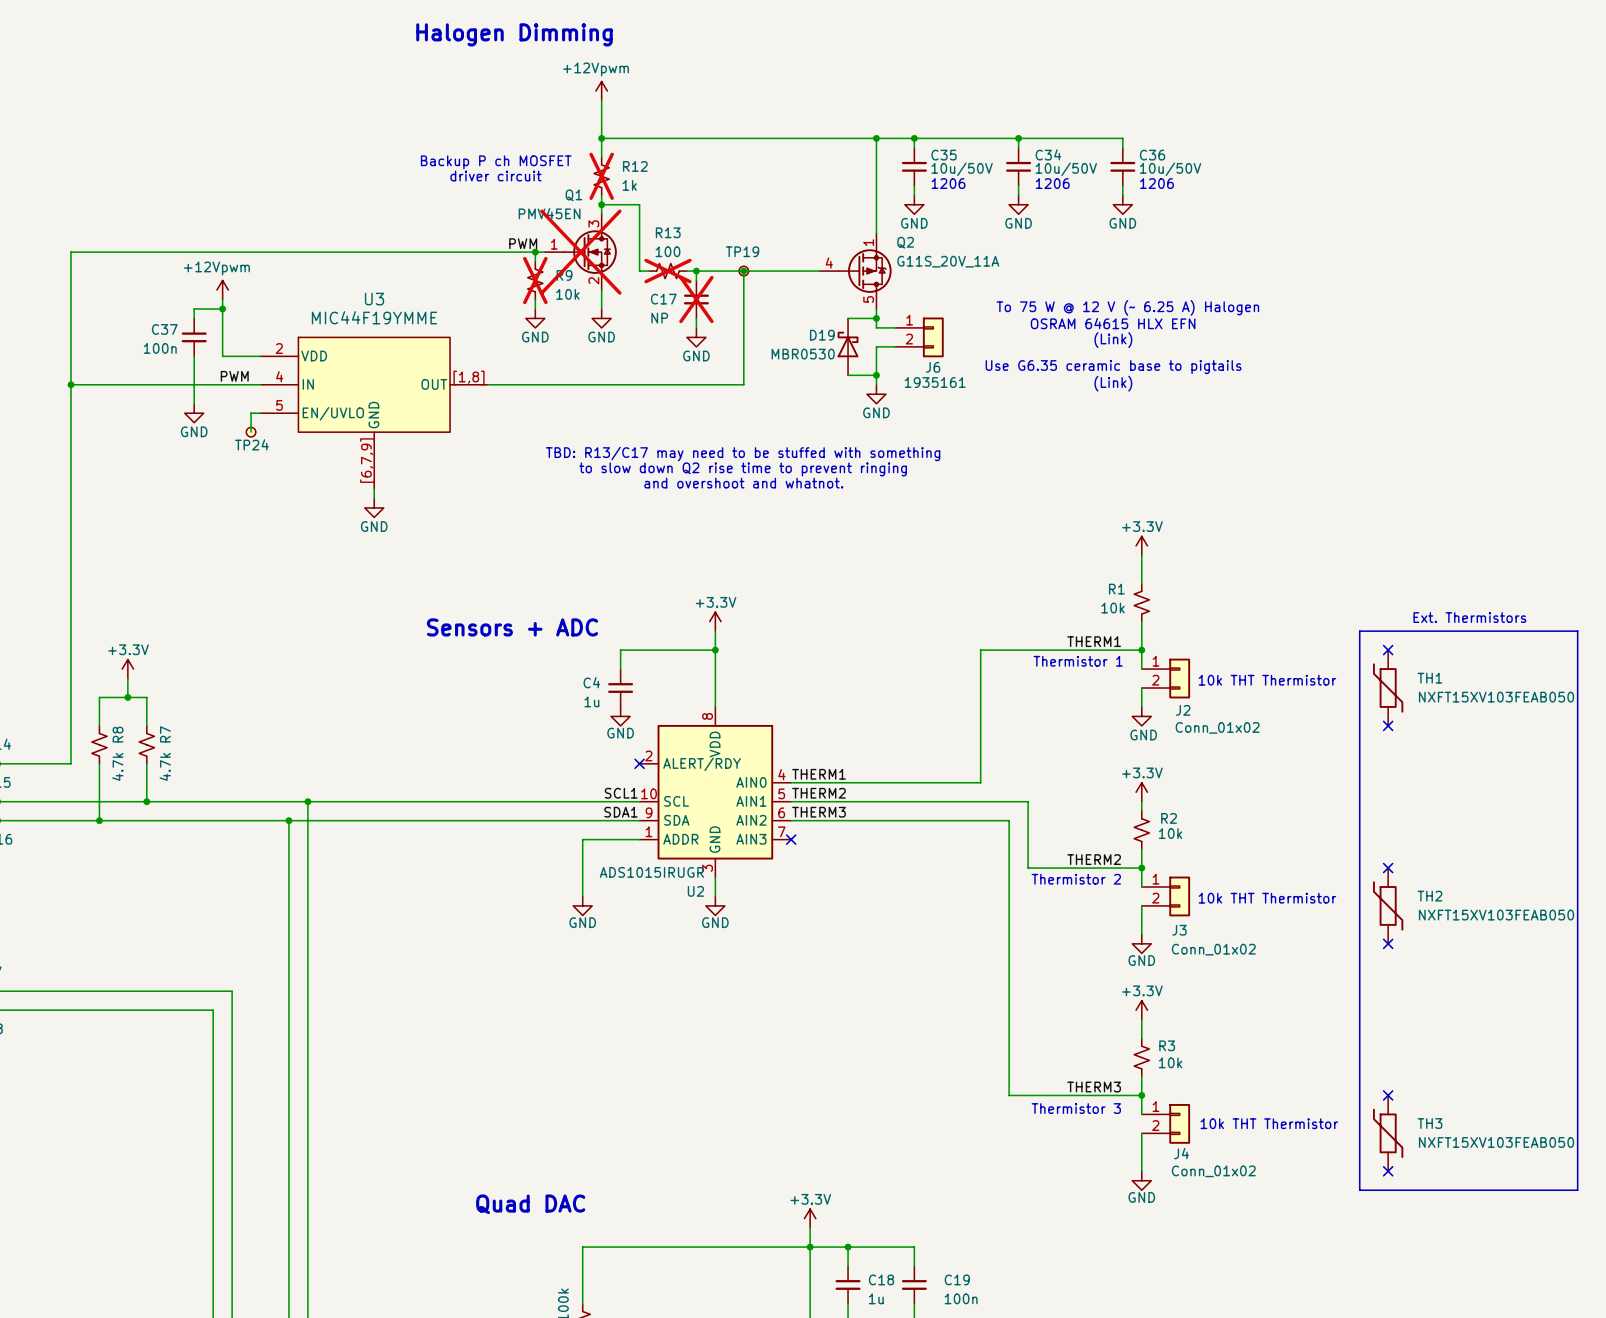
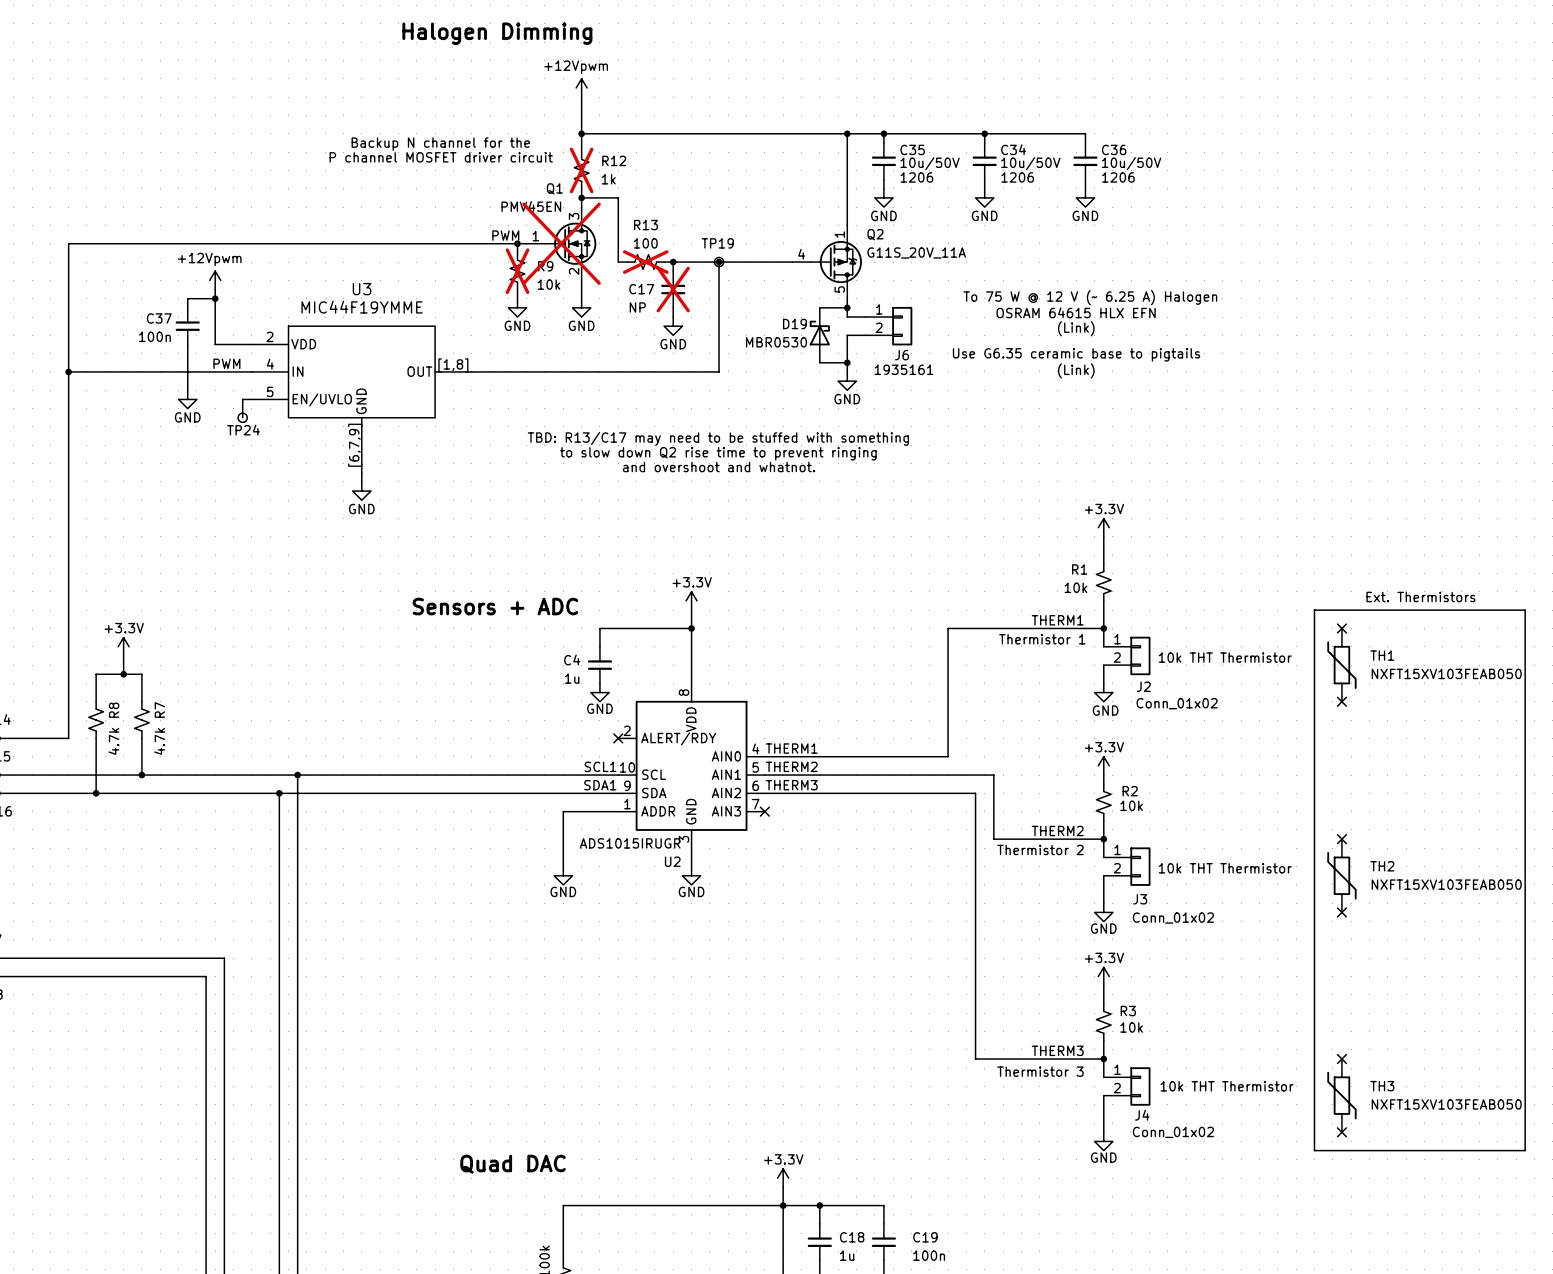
text: none -> Backup N channel for the (440, 144)
text: Backup P ch MOSFET (496, 162) -> none
text: driver circuit (495, 176) -> P channel MOSFET driver circuit (441, 157)

